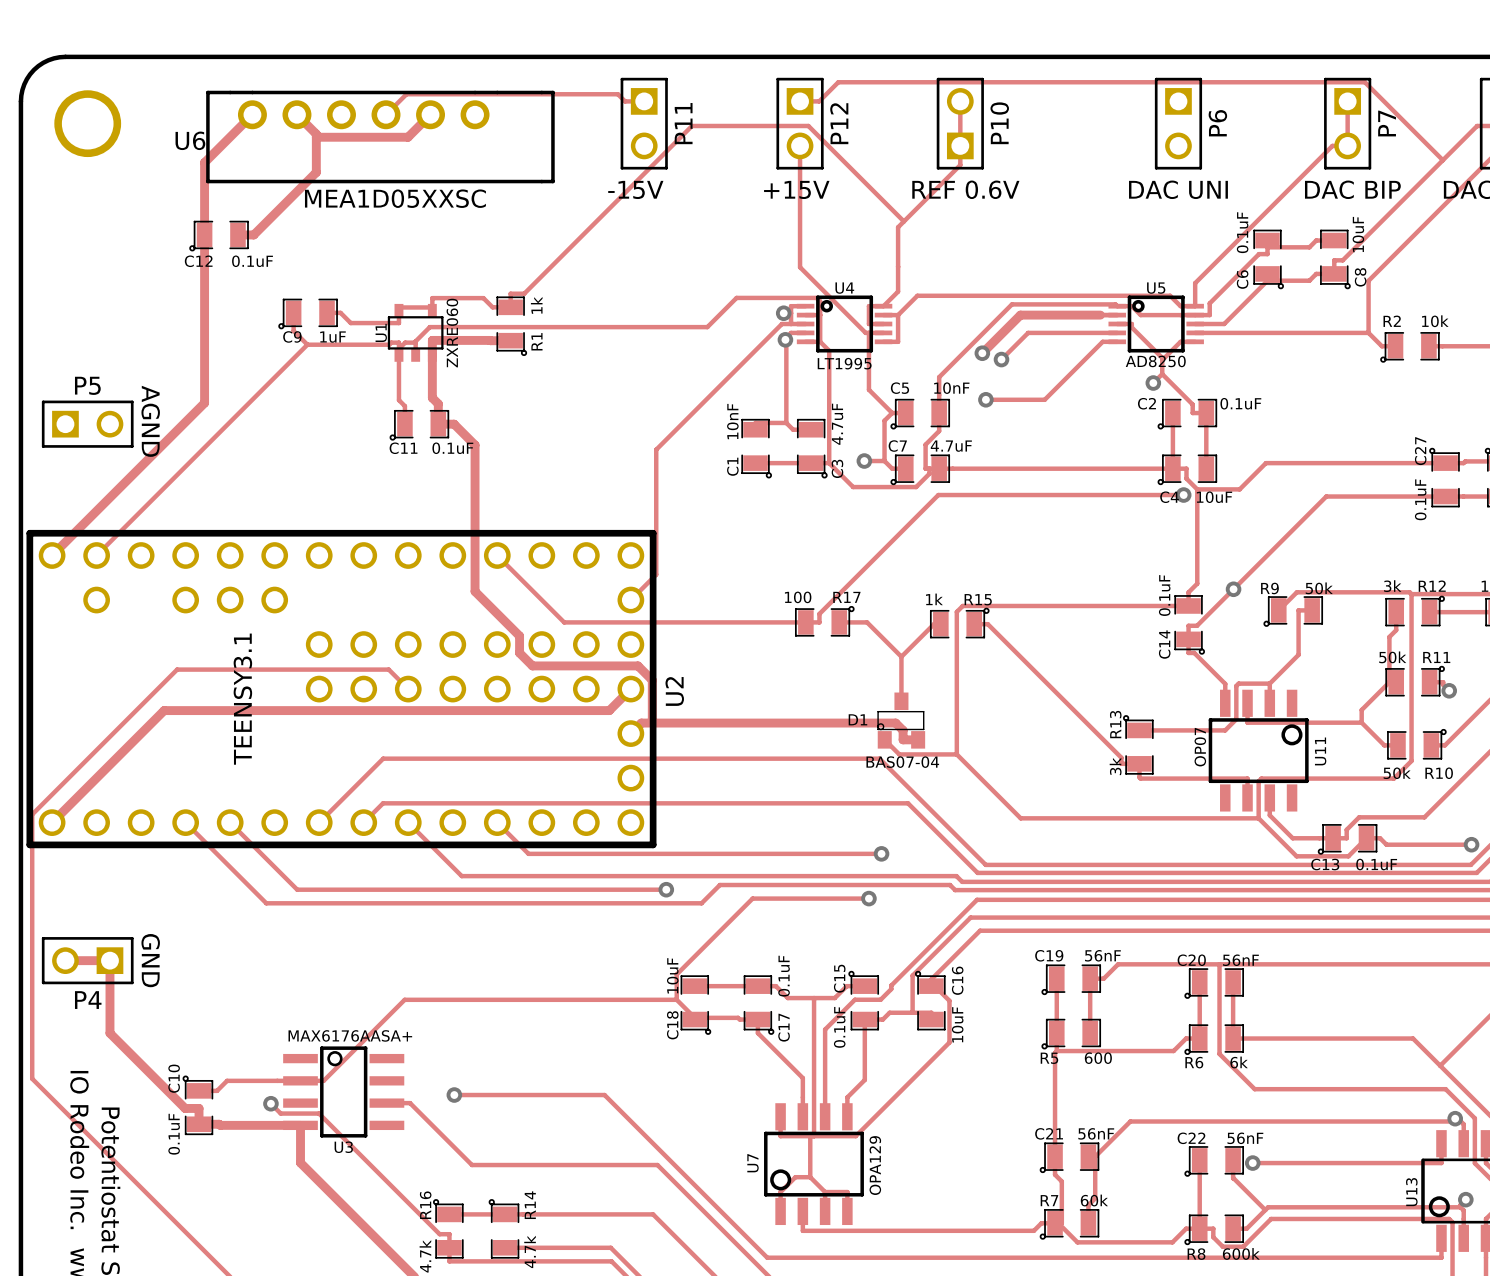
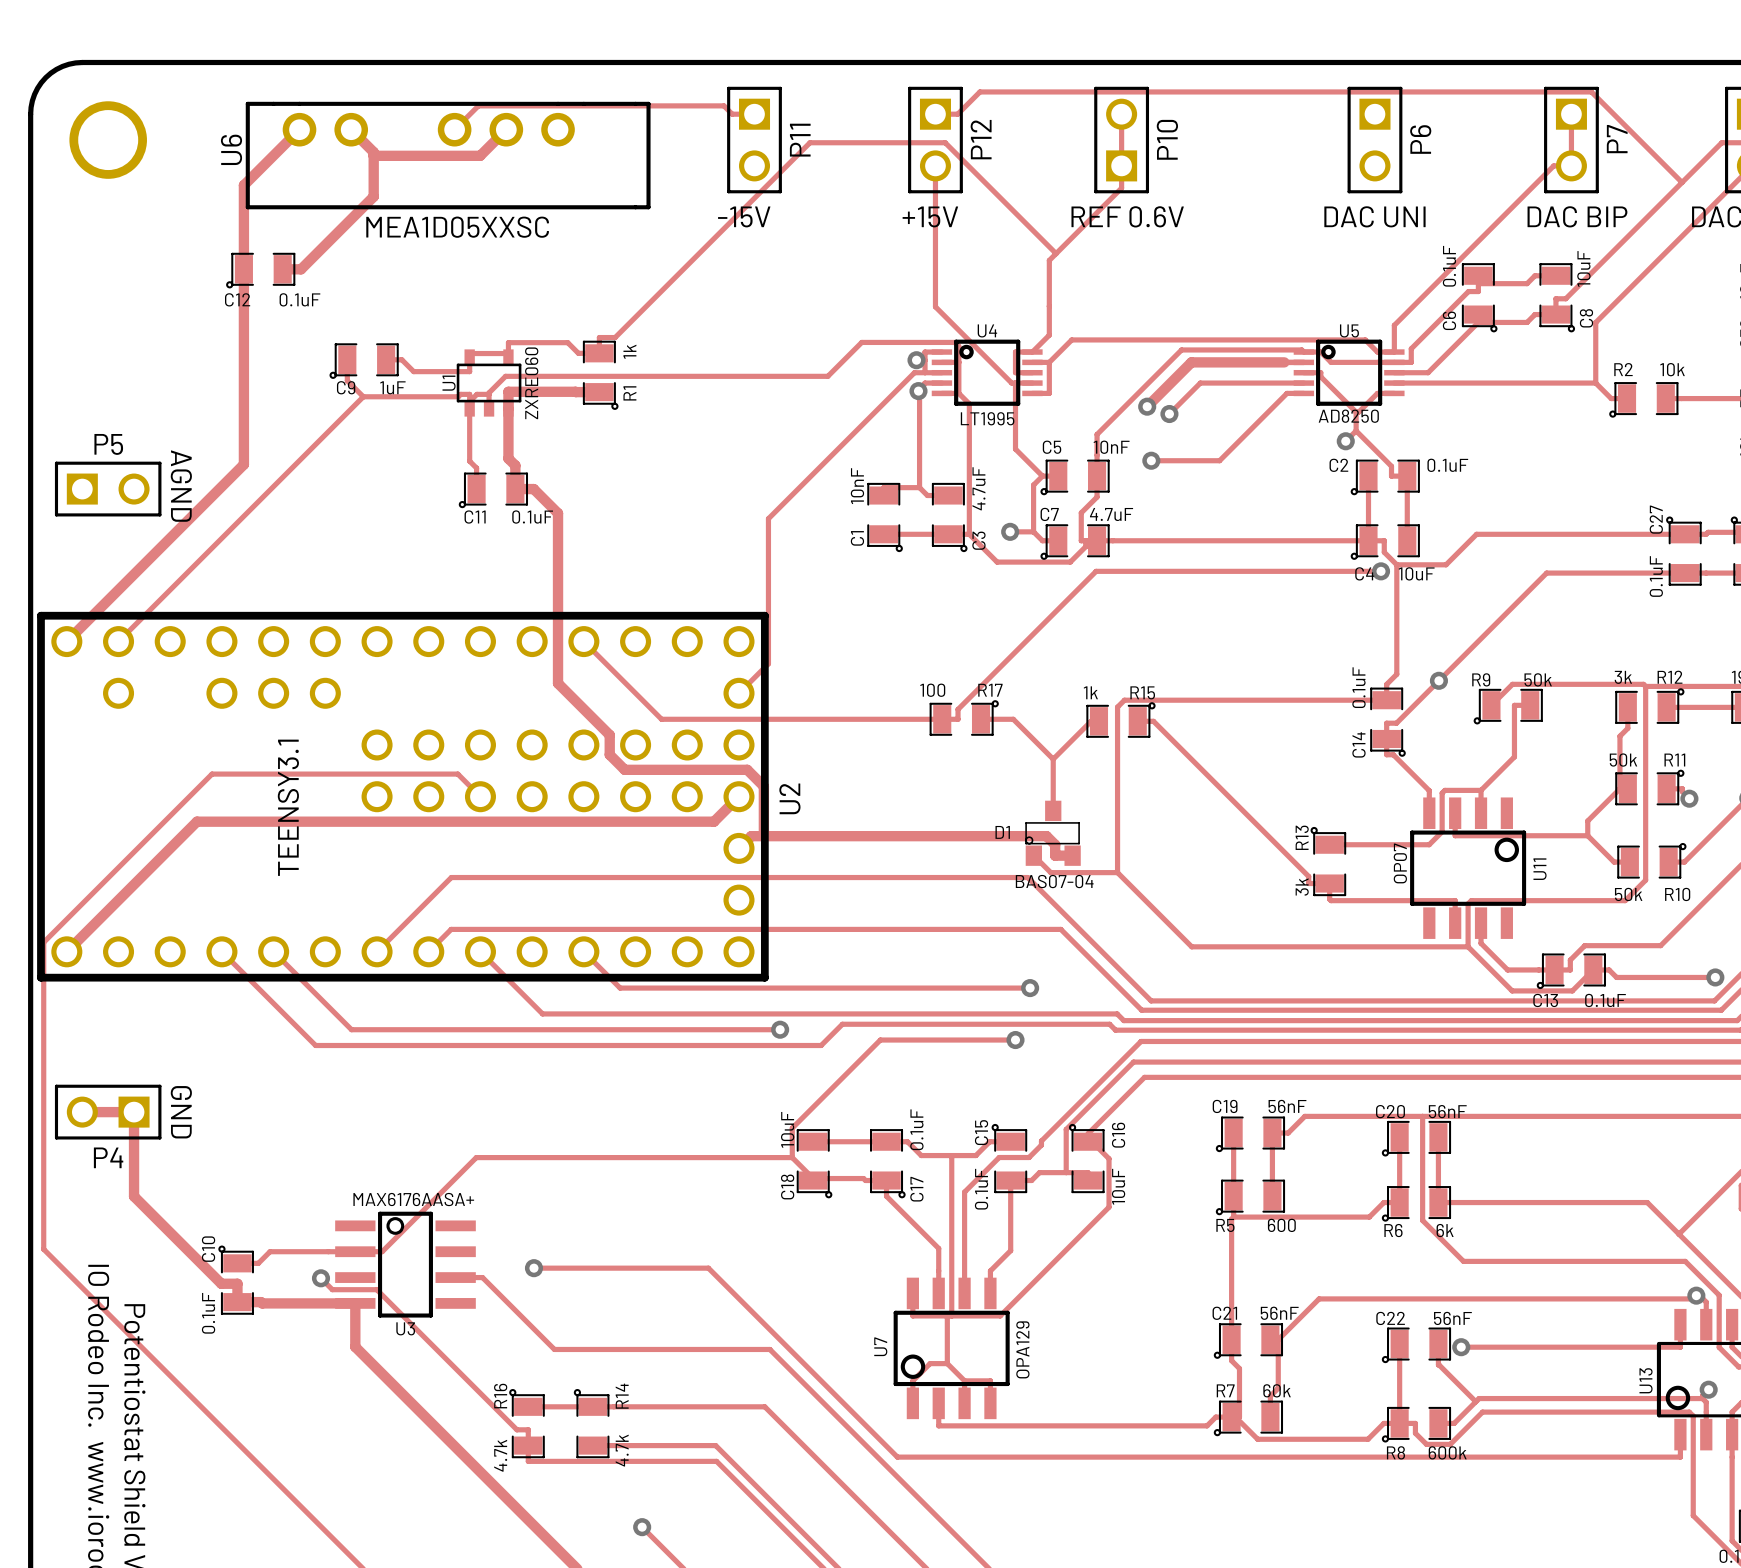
U6 footprint: [206, 90, 555, 184] -> [245, 101, 651, 210]

